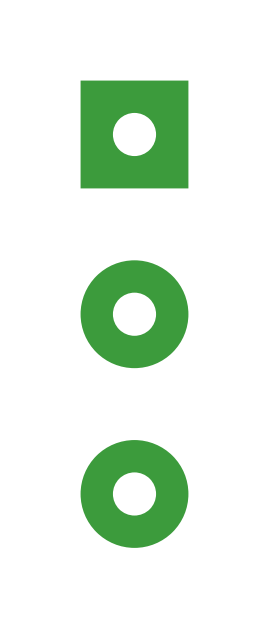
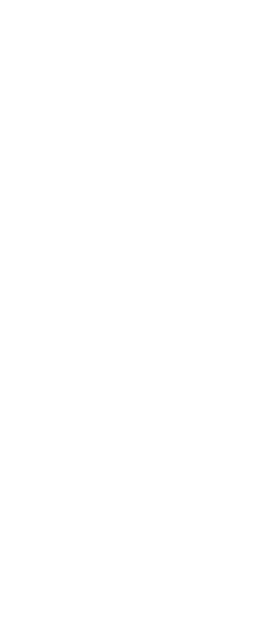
part: (134, 314) -> none

